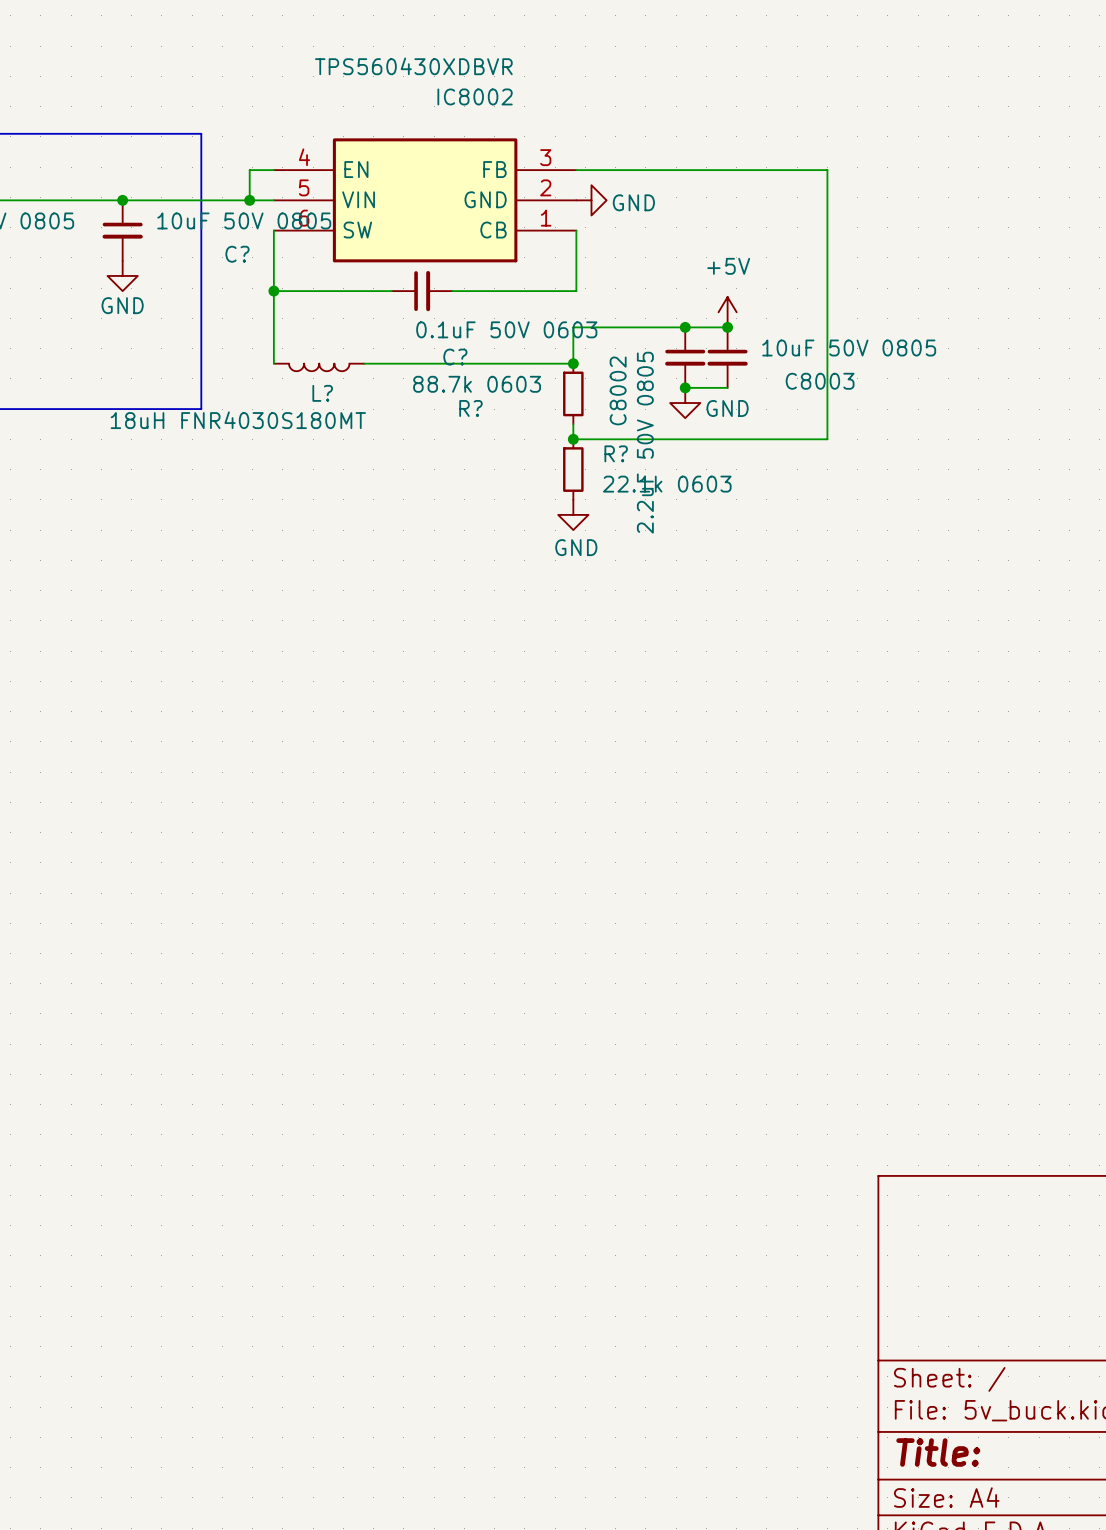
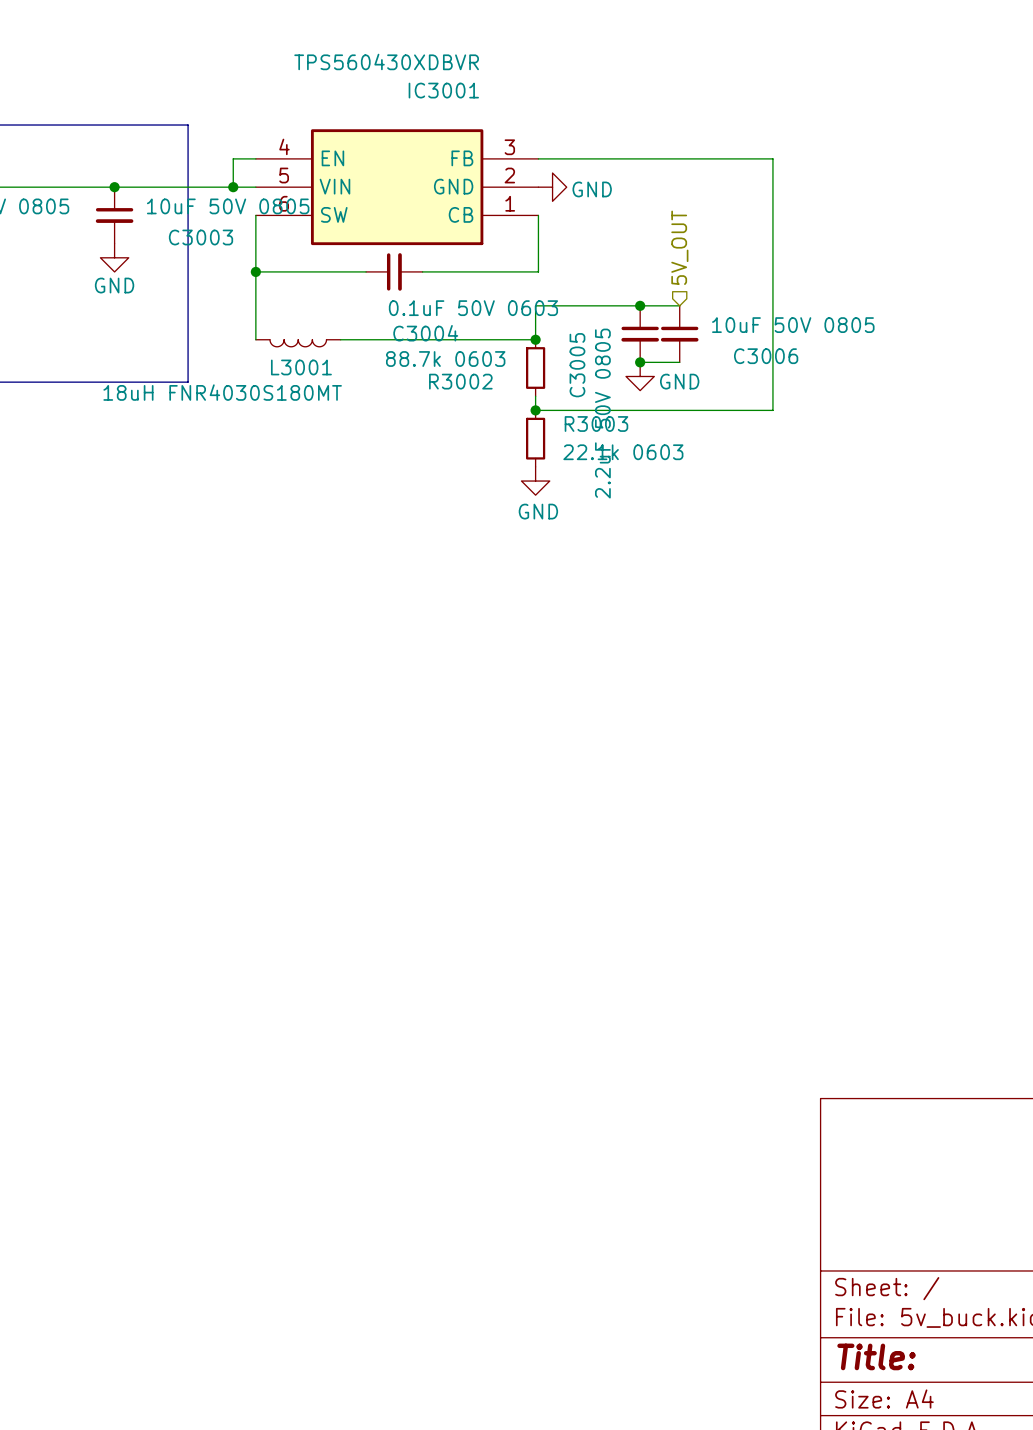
IC8002 name: IC8002 (475, 96) -> IC3001 (443, 90)
C? name: C? (237, 254) -> C3003 (201, 237)
hierarchical label: none -> 5V_OUT (679, 247)
power symbol: +5V (727, 312) -> none
junction: (727, 327) -> none
C? name: C? (455, 357) -> C3004 (425, 333)
C8003 name: C8003 (820, 381) -> C3006 (766, 356)
C8002 name: C8002 (618, 390) -> C3005 (577, 365)
L? name: L? (322, 393) -> L3001 (301, 367)
R? name: R? (470, 408) -> R3002 (460, 381)
R? name: R? (616, 453) -> R3003 (596, 423)

